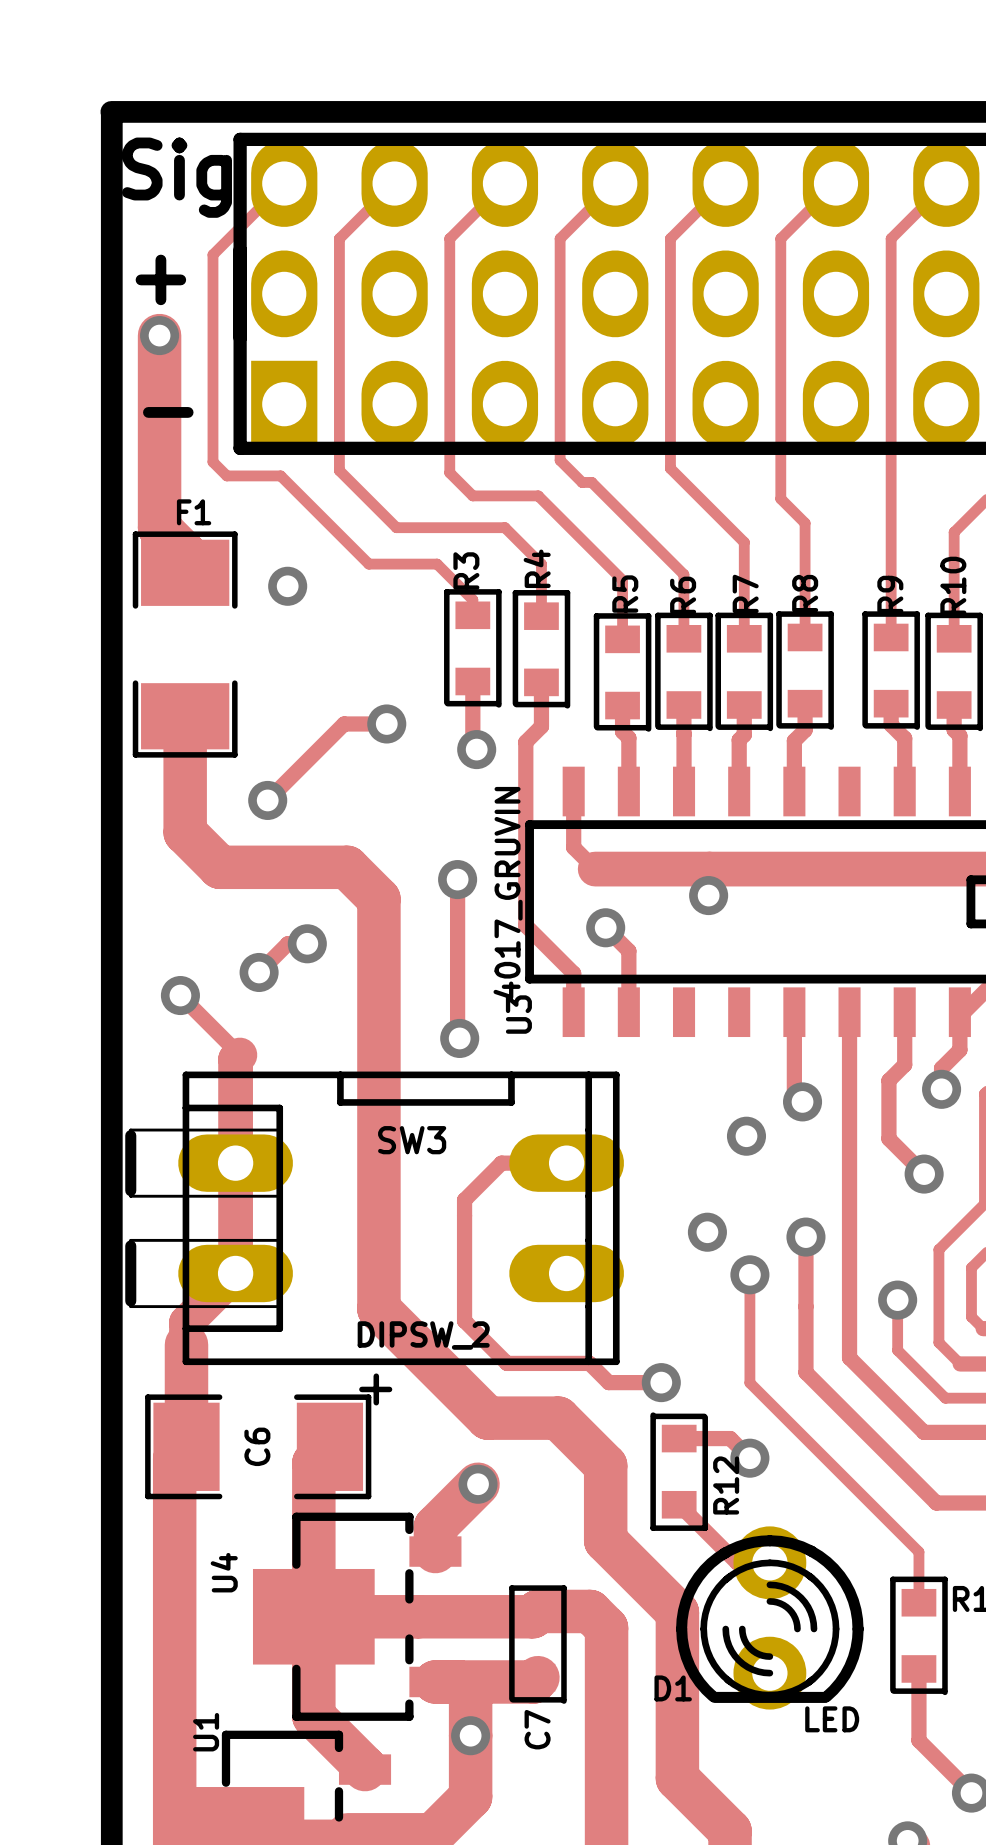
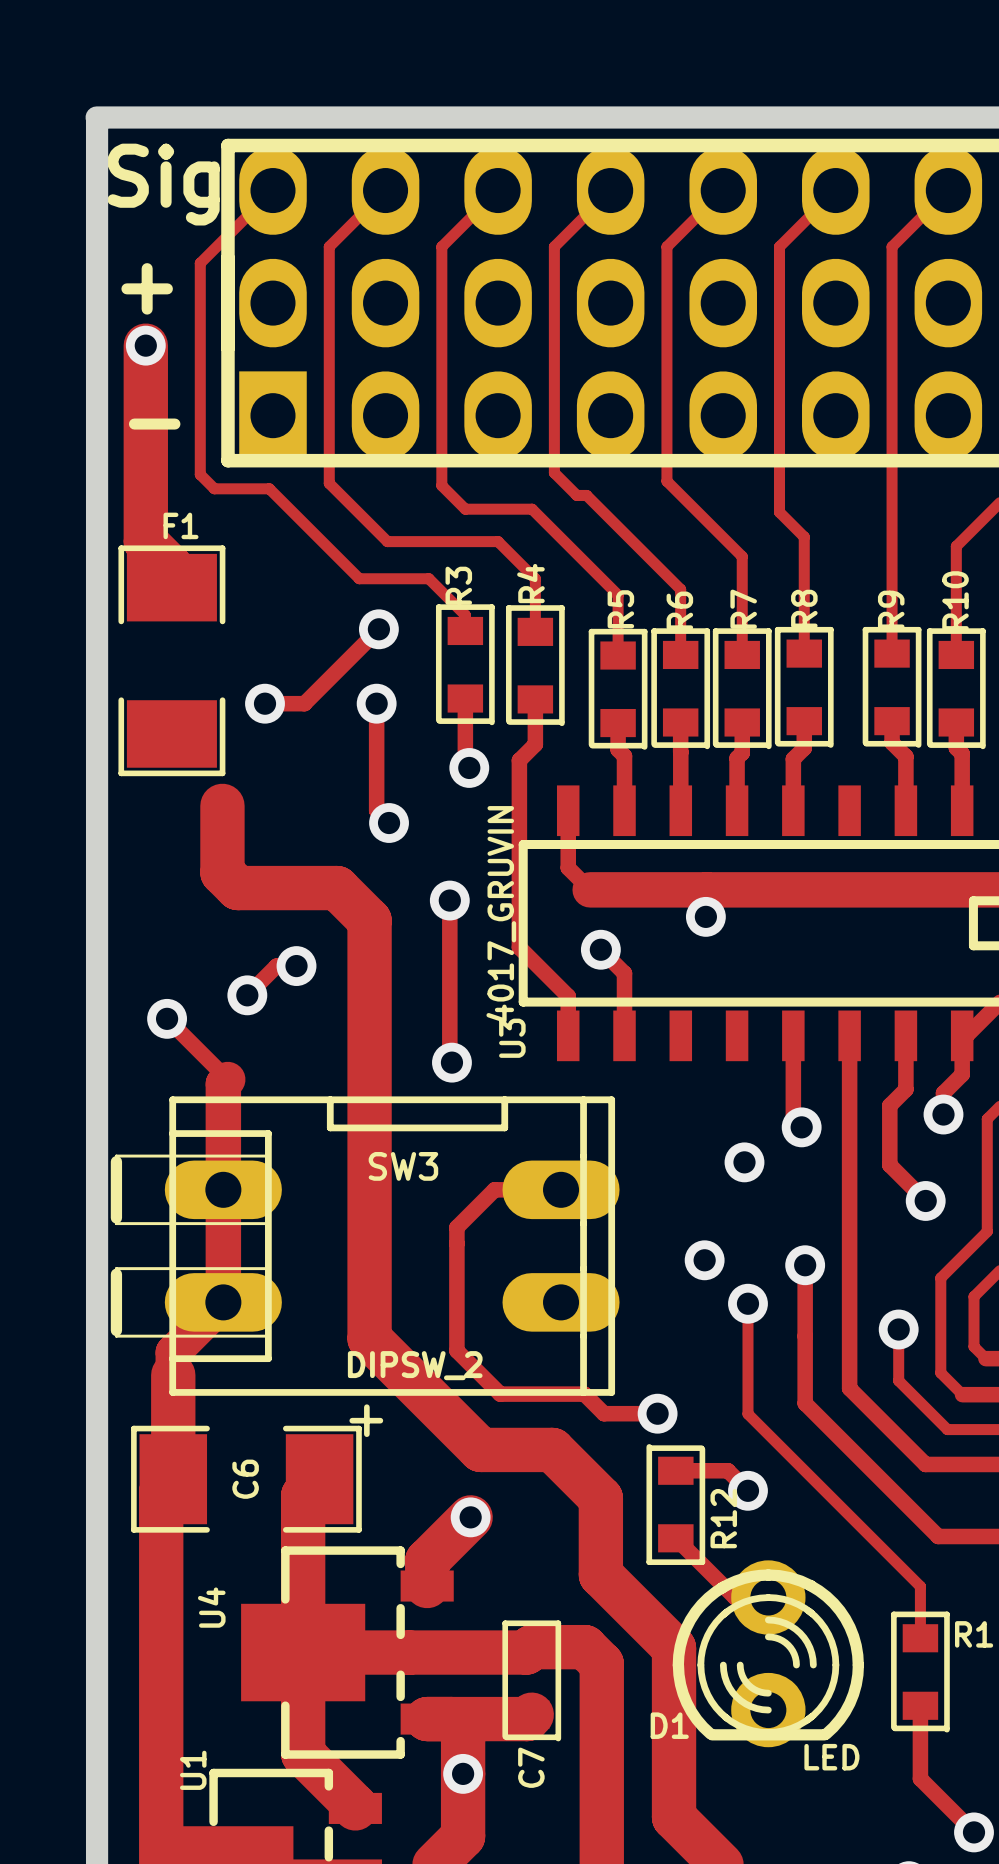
via: (287, 586) -> none
track: none -> (378, 629) (304, 703) (265, 703)
via: none -> (378, 629)
via: none -> (265, 703)
track: none -> (376, 703) (376, 810) (389, 823)
track: (185, 716) (185, 832) (219, 867) (249, 867) -> (222, 805) (222, 872) (237, 888)
track: (386, 723) (344, 723) (267, 800) -> none
via position: (386, 723) -> (376, 703)
via: (267, 800) -> none
via: none -> (389, 823)

